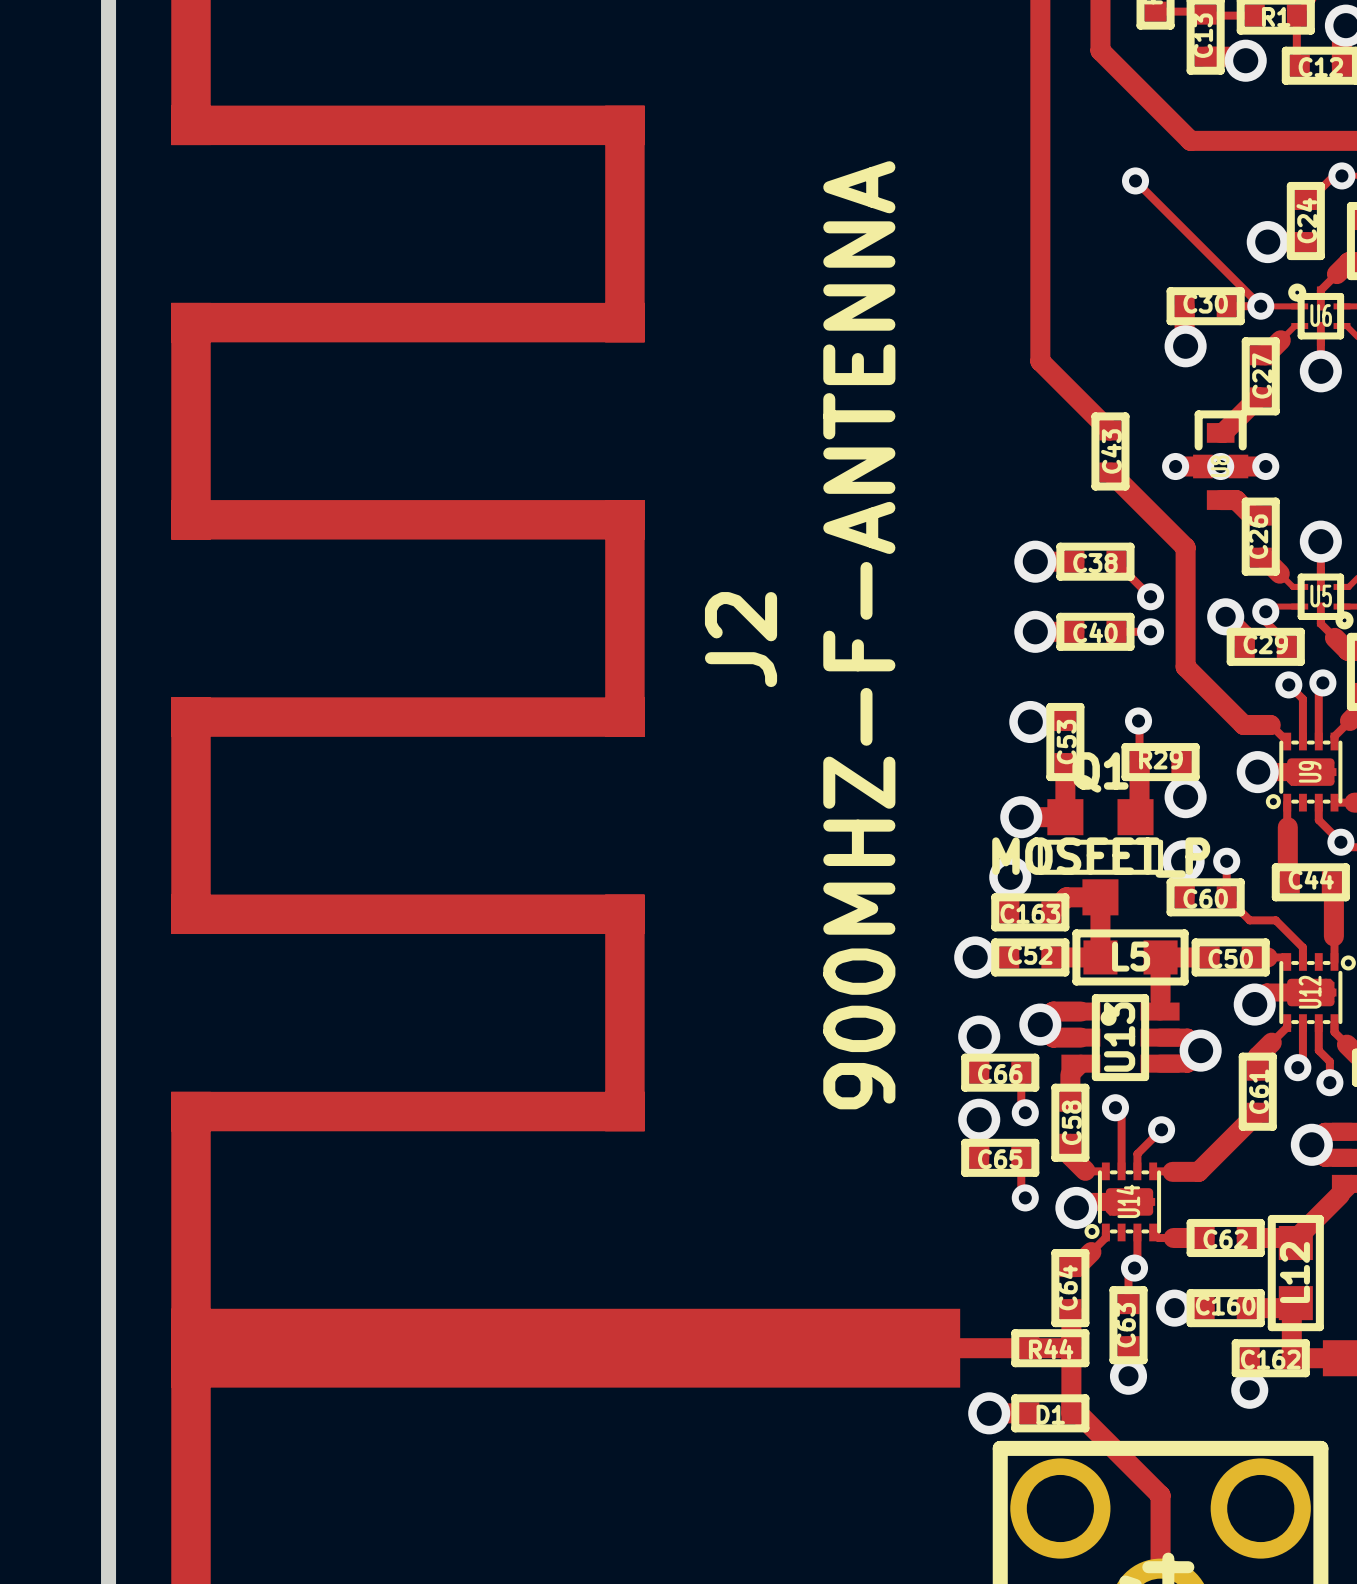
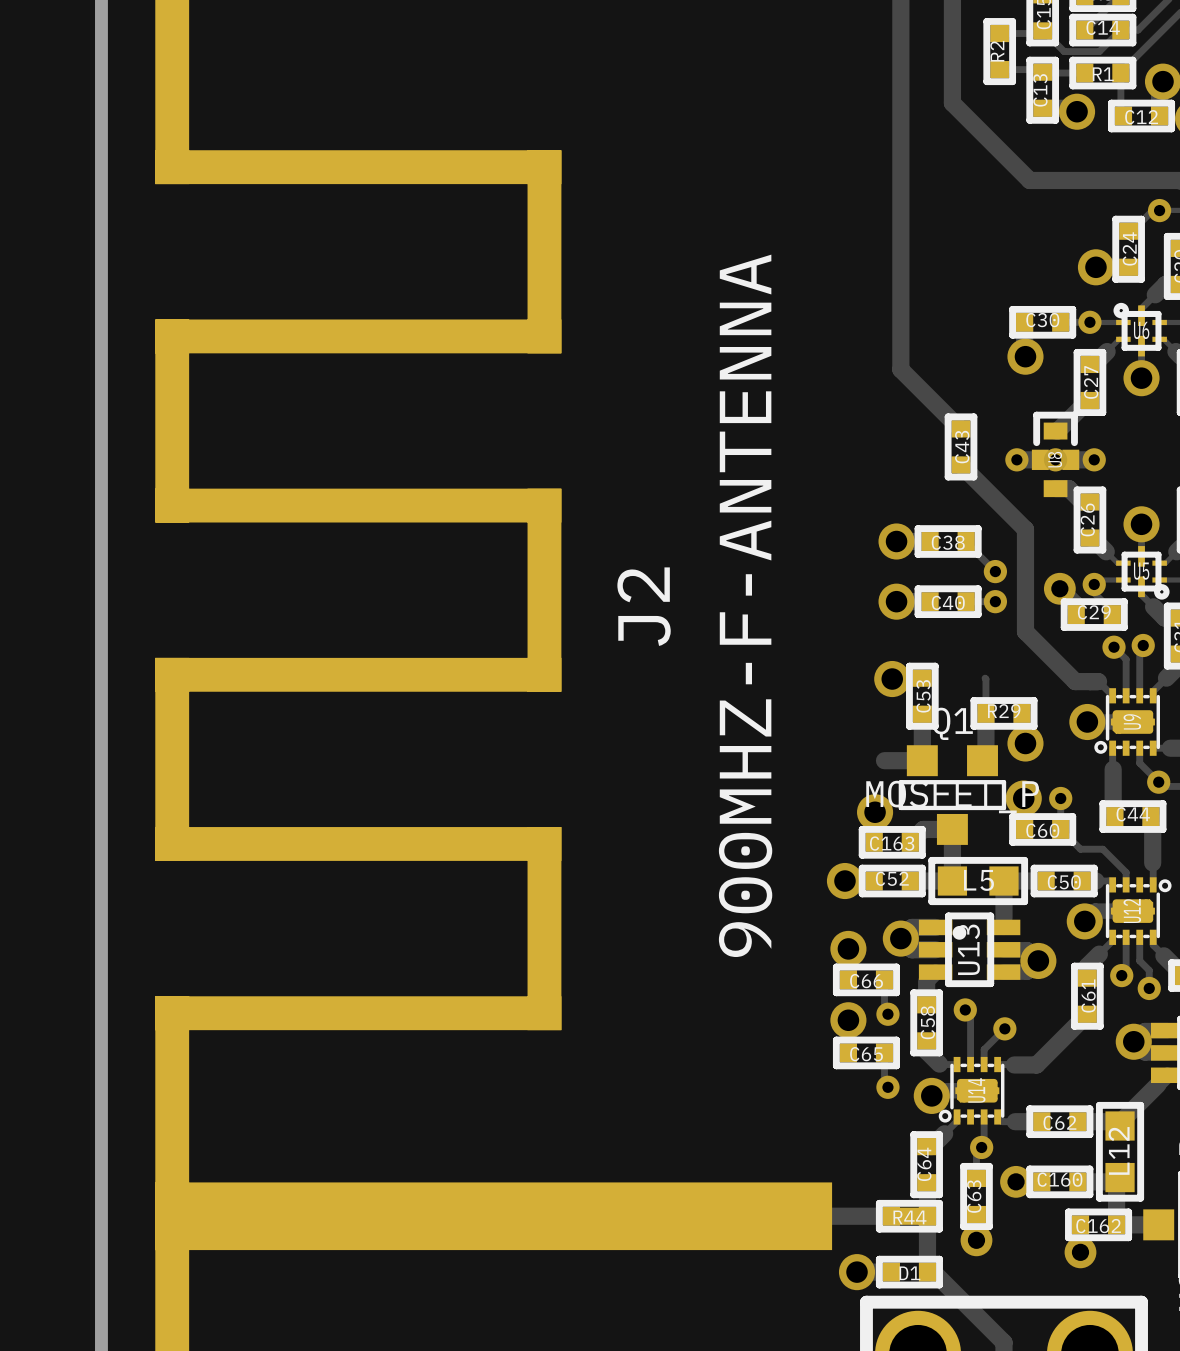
track: (1135, 180) (1260, 306) -> none
via: (1135, 180) -> none
via: (1138, 720) -> none
via: (1021, 817) -> none

